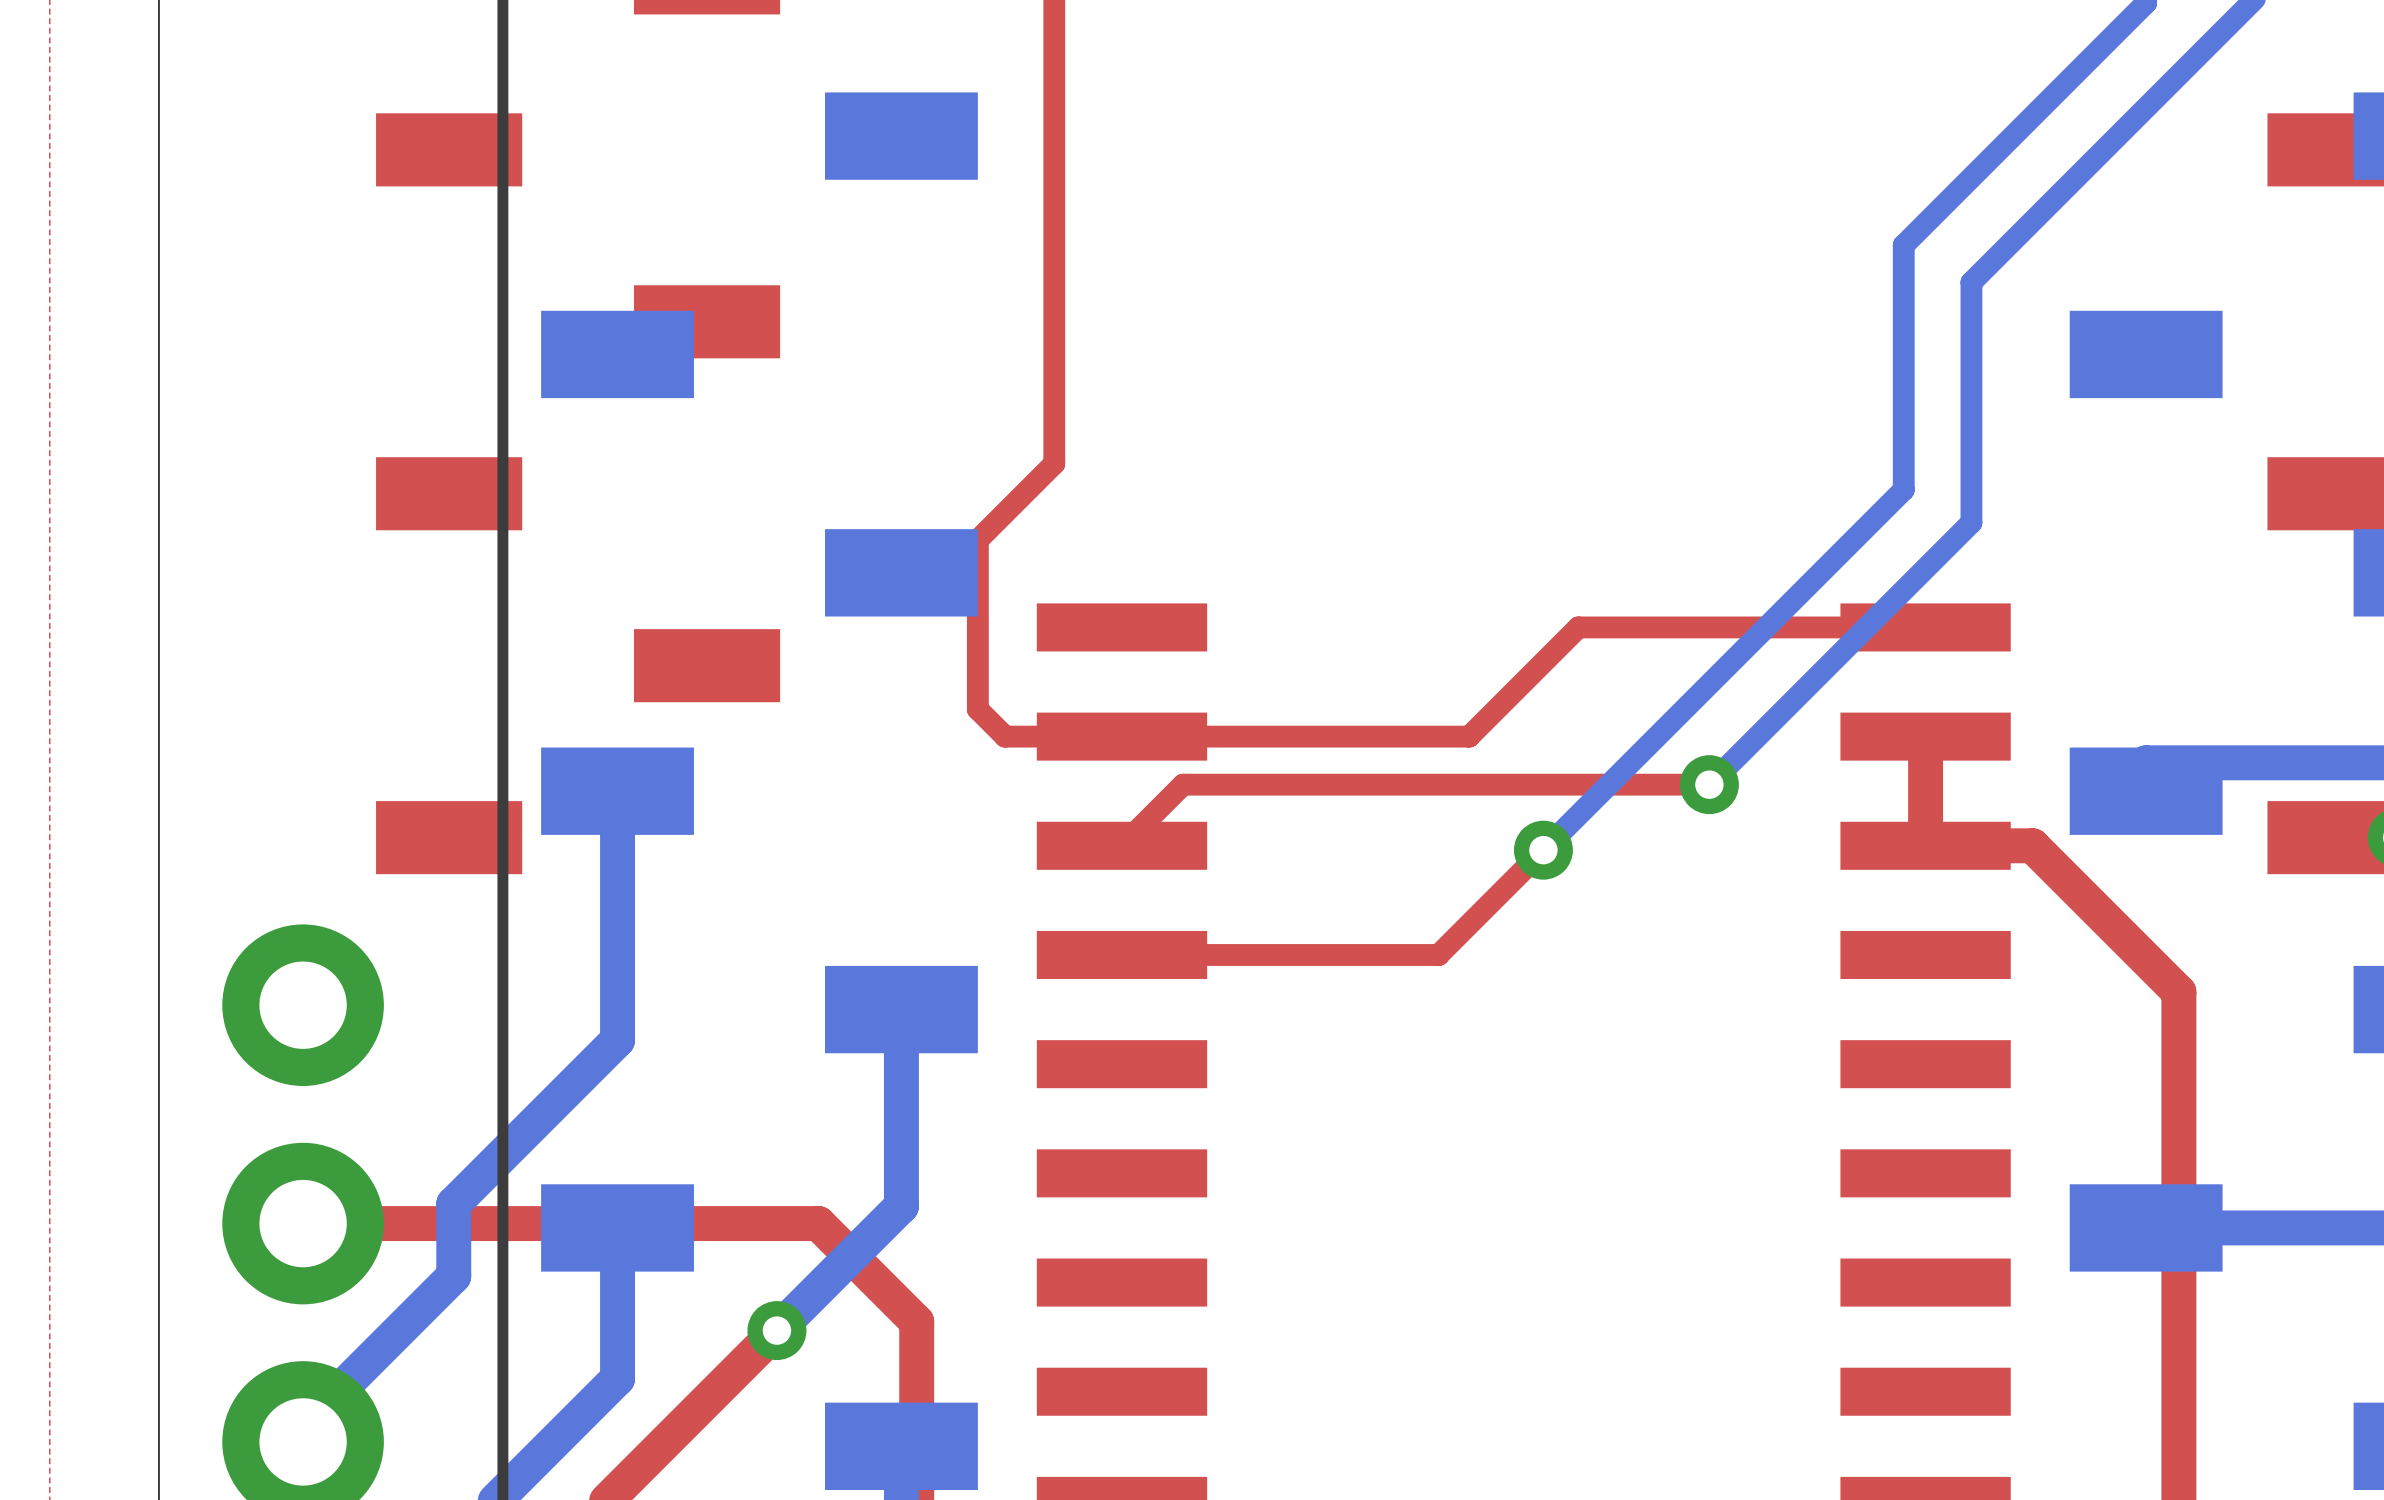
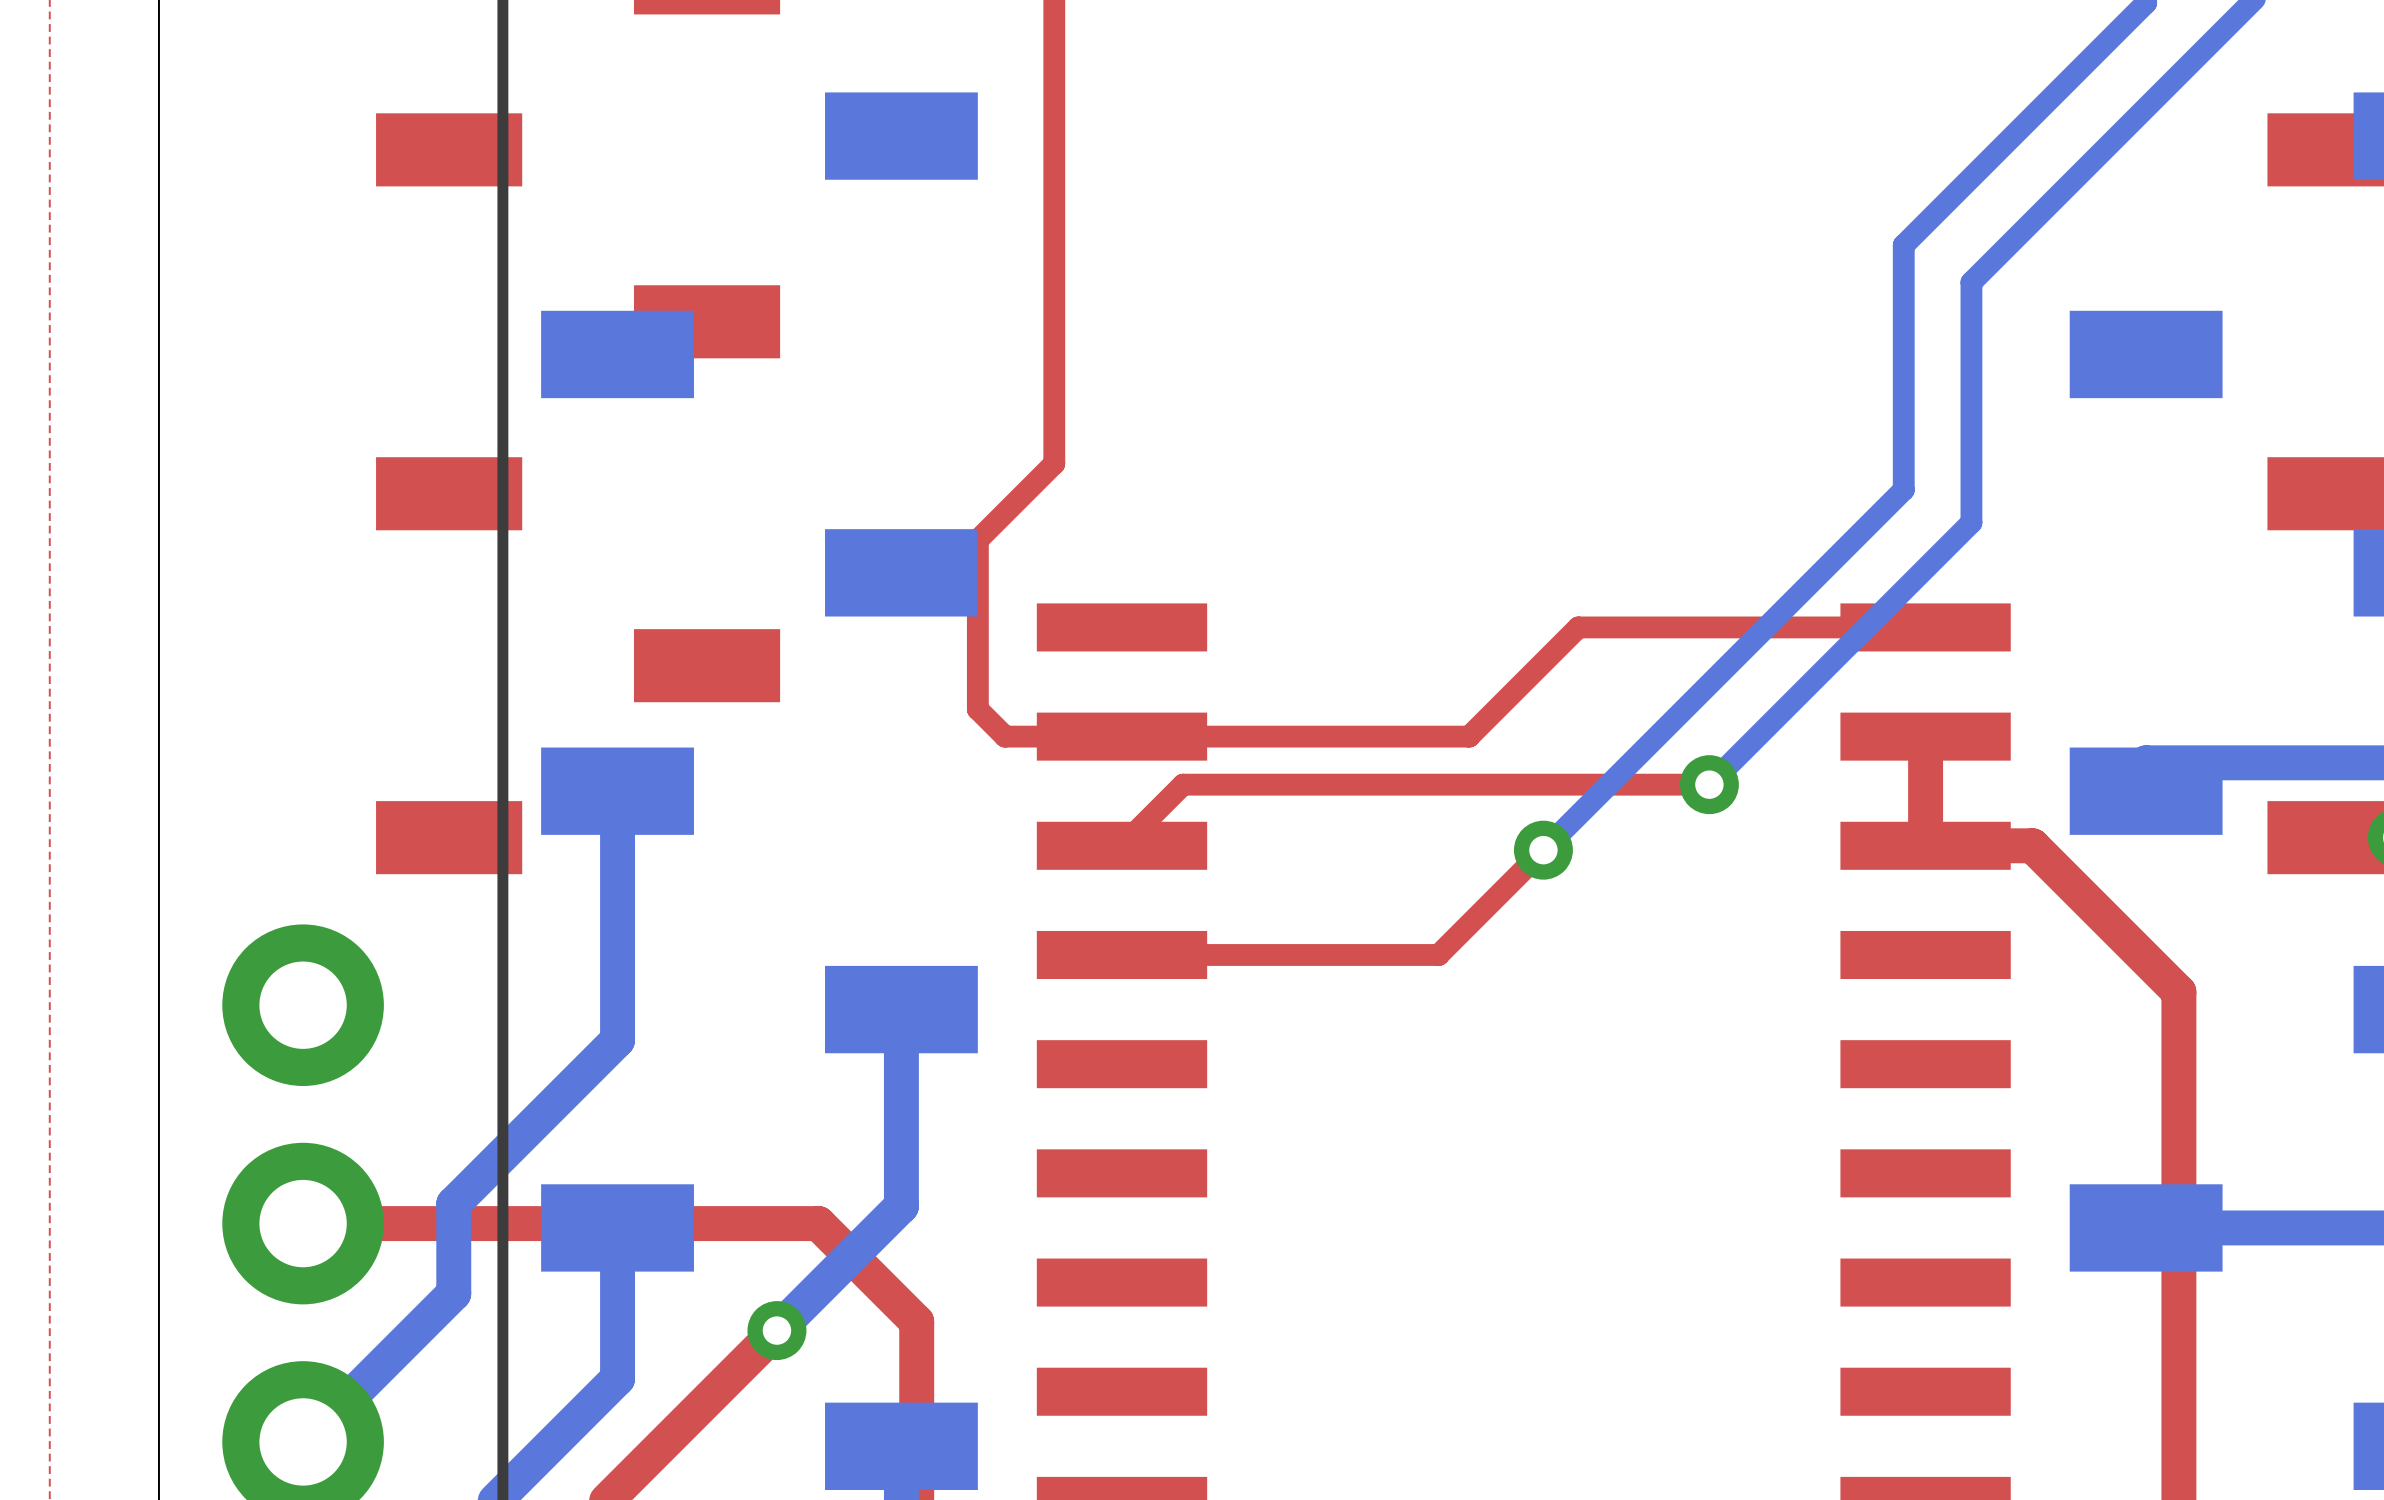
bottom track: (453, 1275) (303, 1426) (303, 1441) -> (453, 1275) (453, 1293) (311, 1435)

